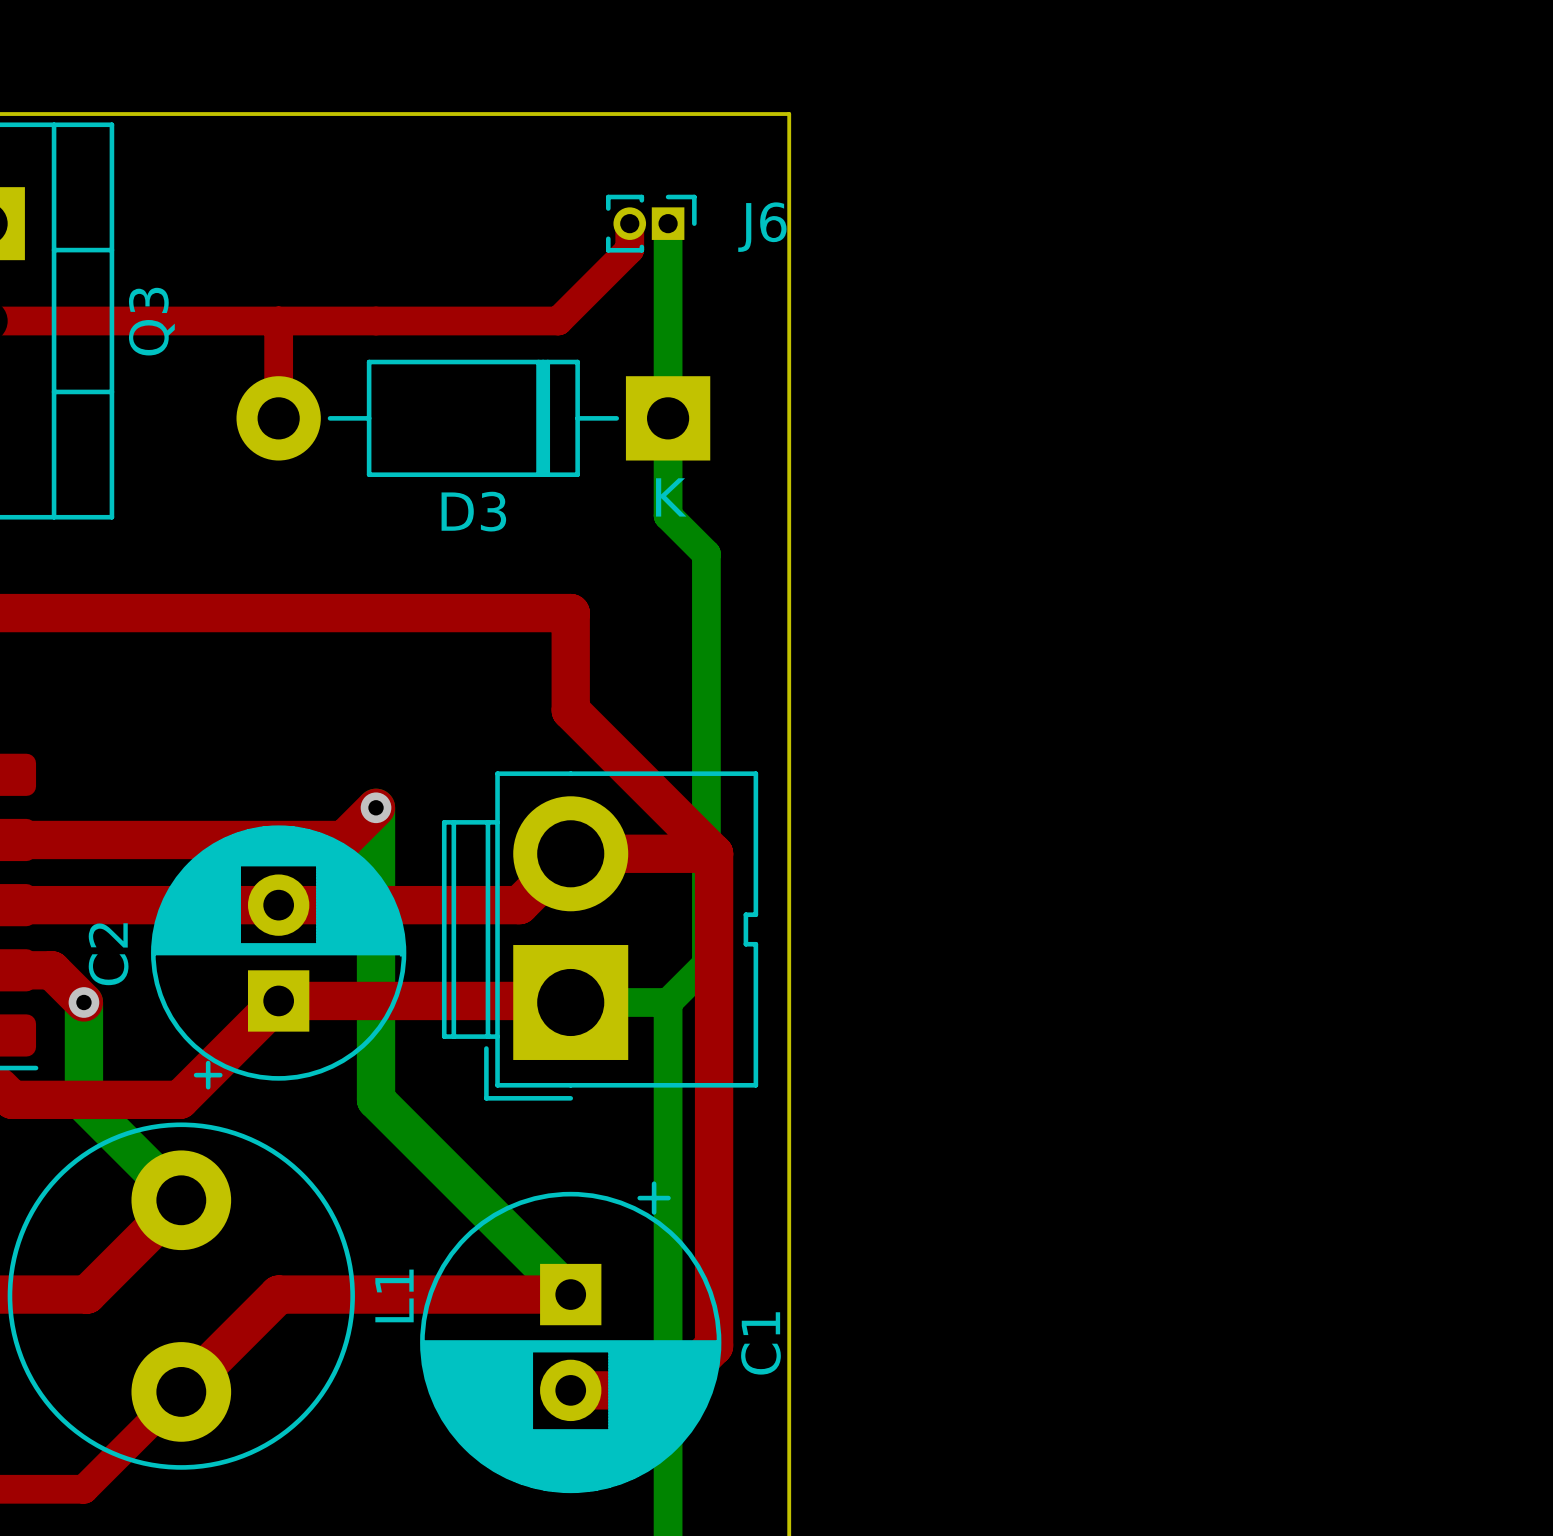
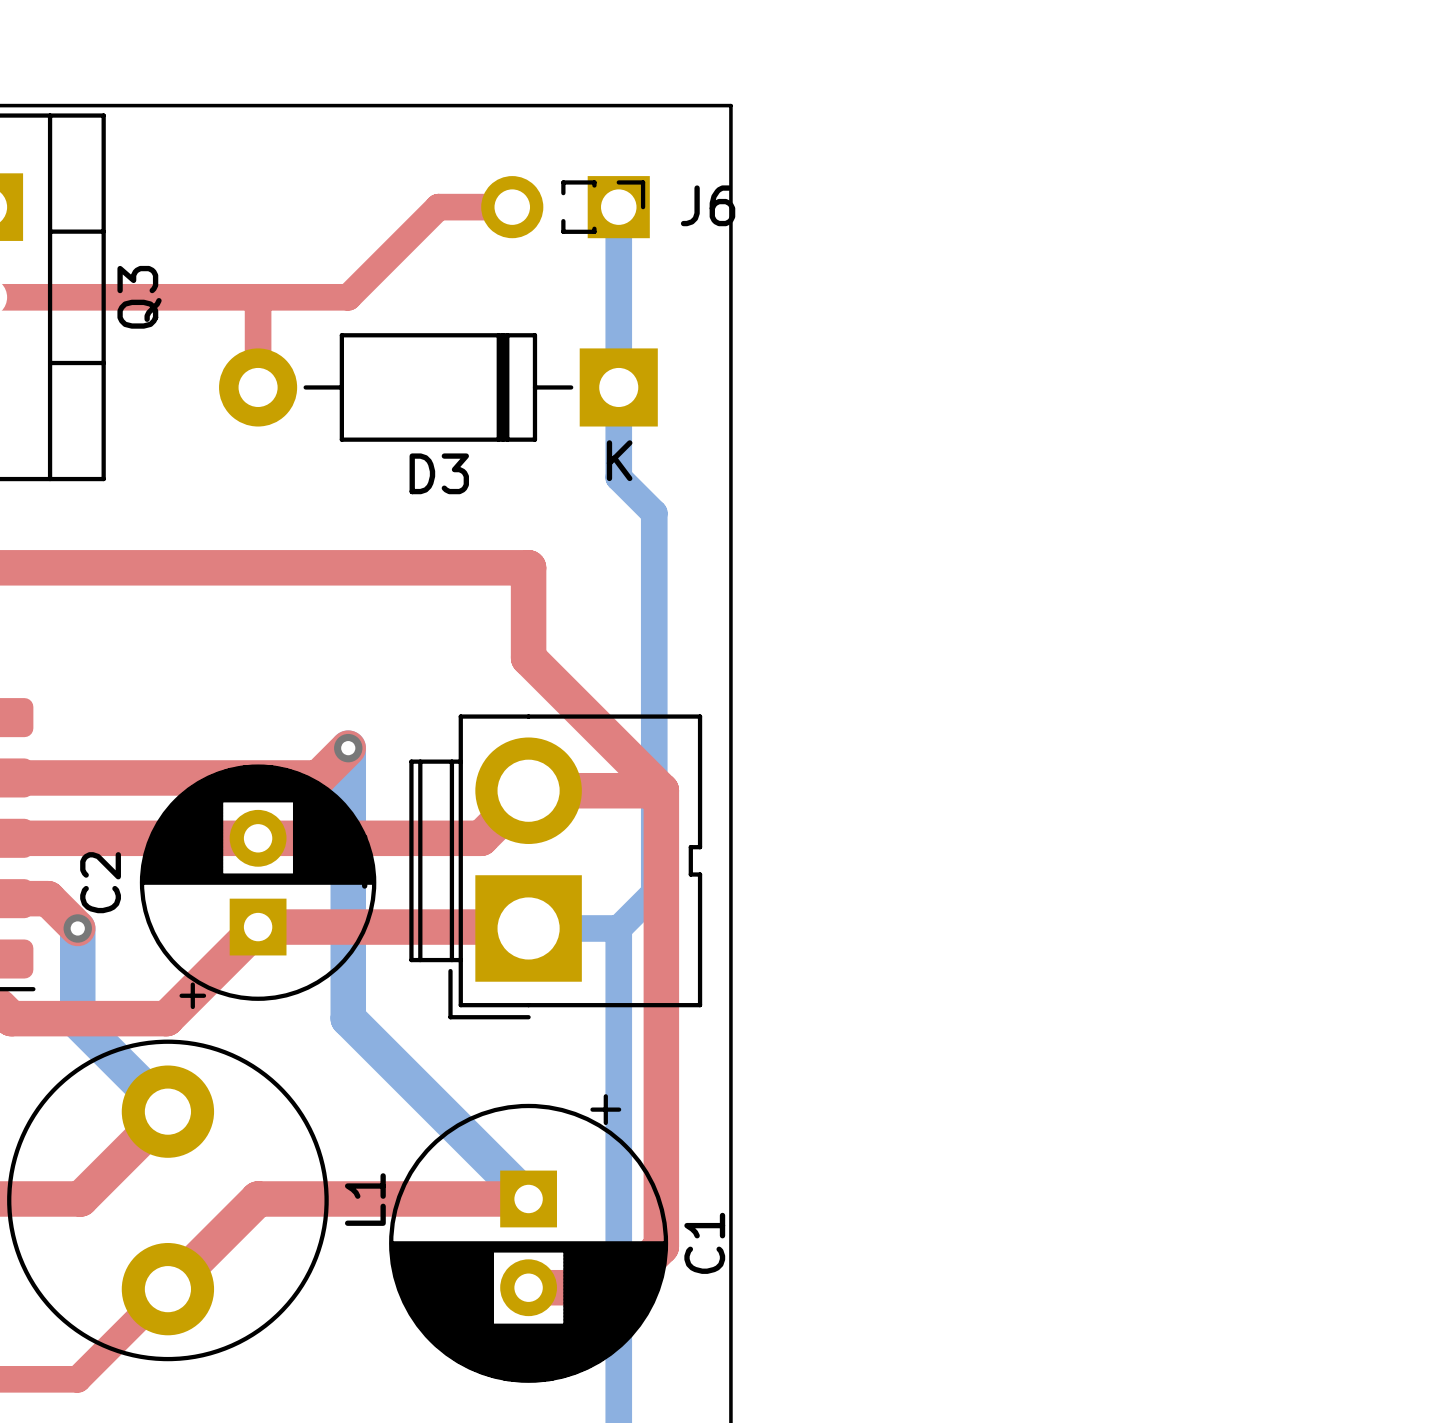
J6 footprint: [605, 194, 697, 253] -> [481, 176, 650, 239]
top track: (629, 223) (629, 249) (558, 321) (376, 321) -> (512, 207) (438, 207) (348, 297)

